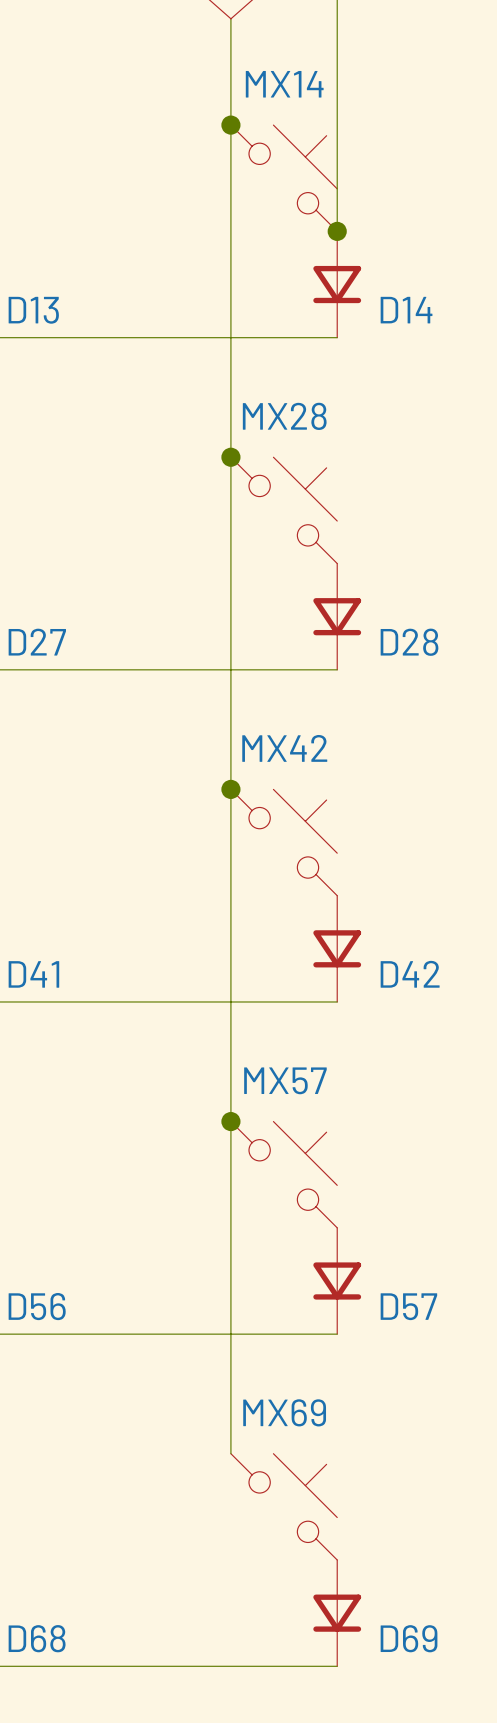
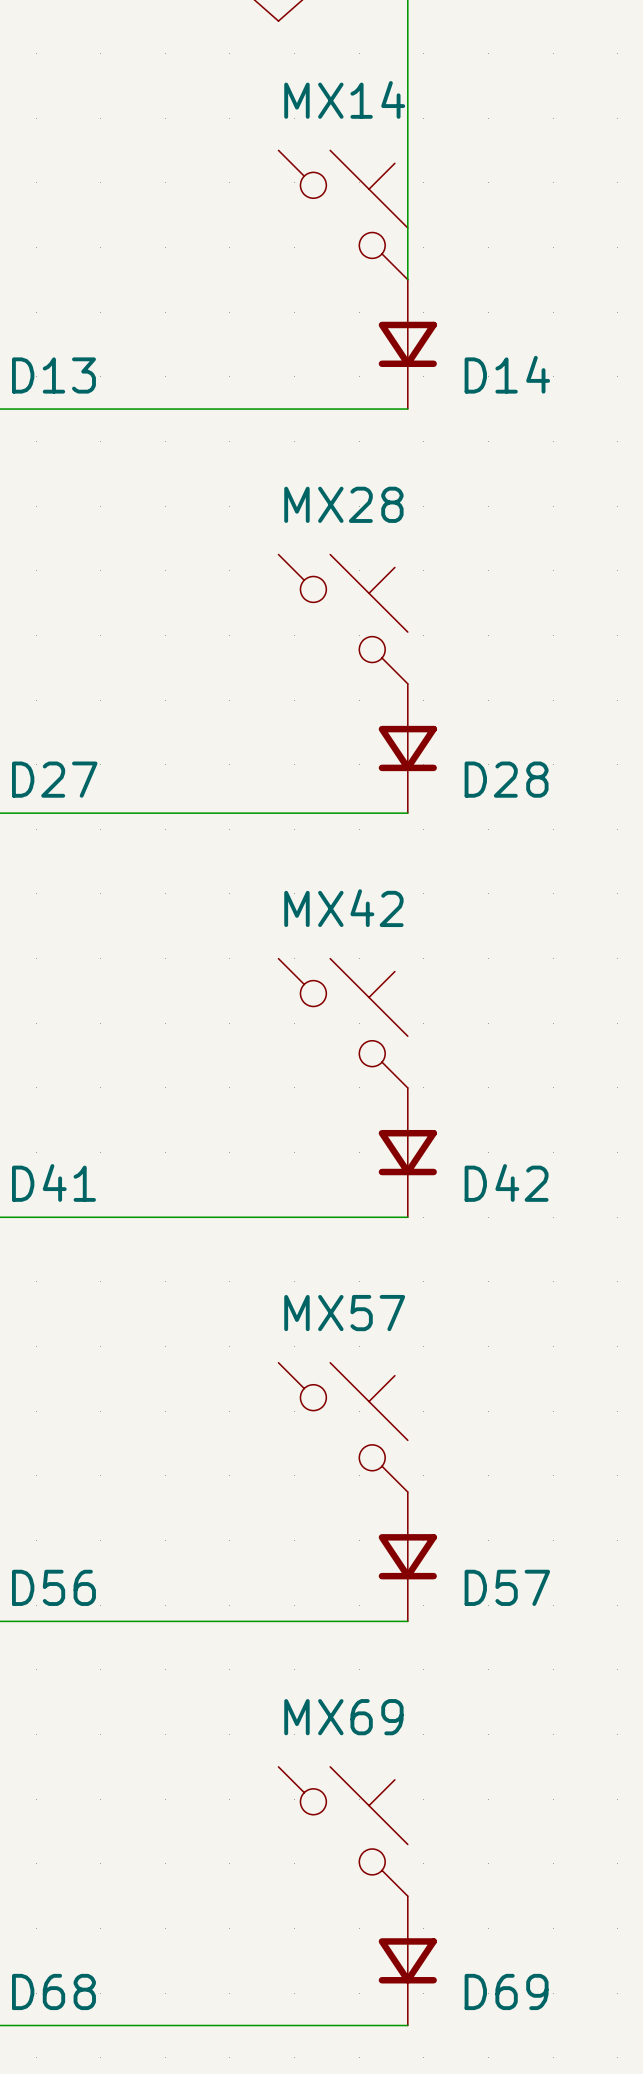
wire: (230, 18) (230, 1453) -> none
junction: (230, 125) -> none
junction: (337, 231) -> none
junction: (230, 457) -> none
junction: (230, 789) -> none
junction: (230, 1121) -> none

